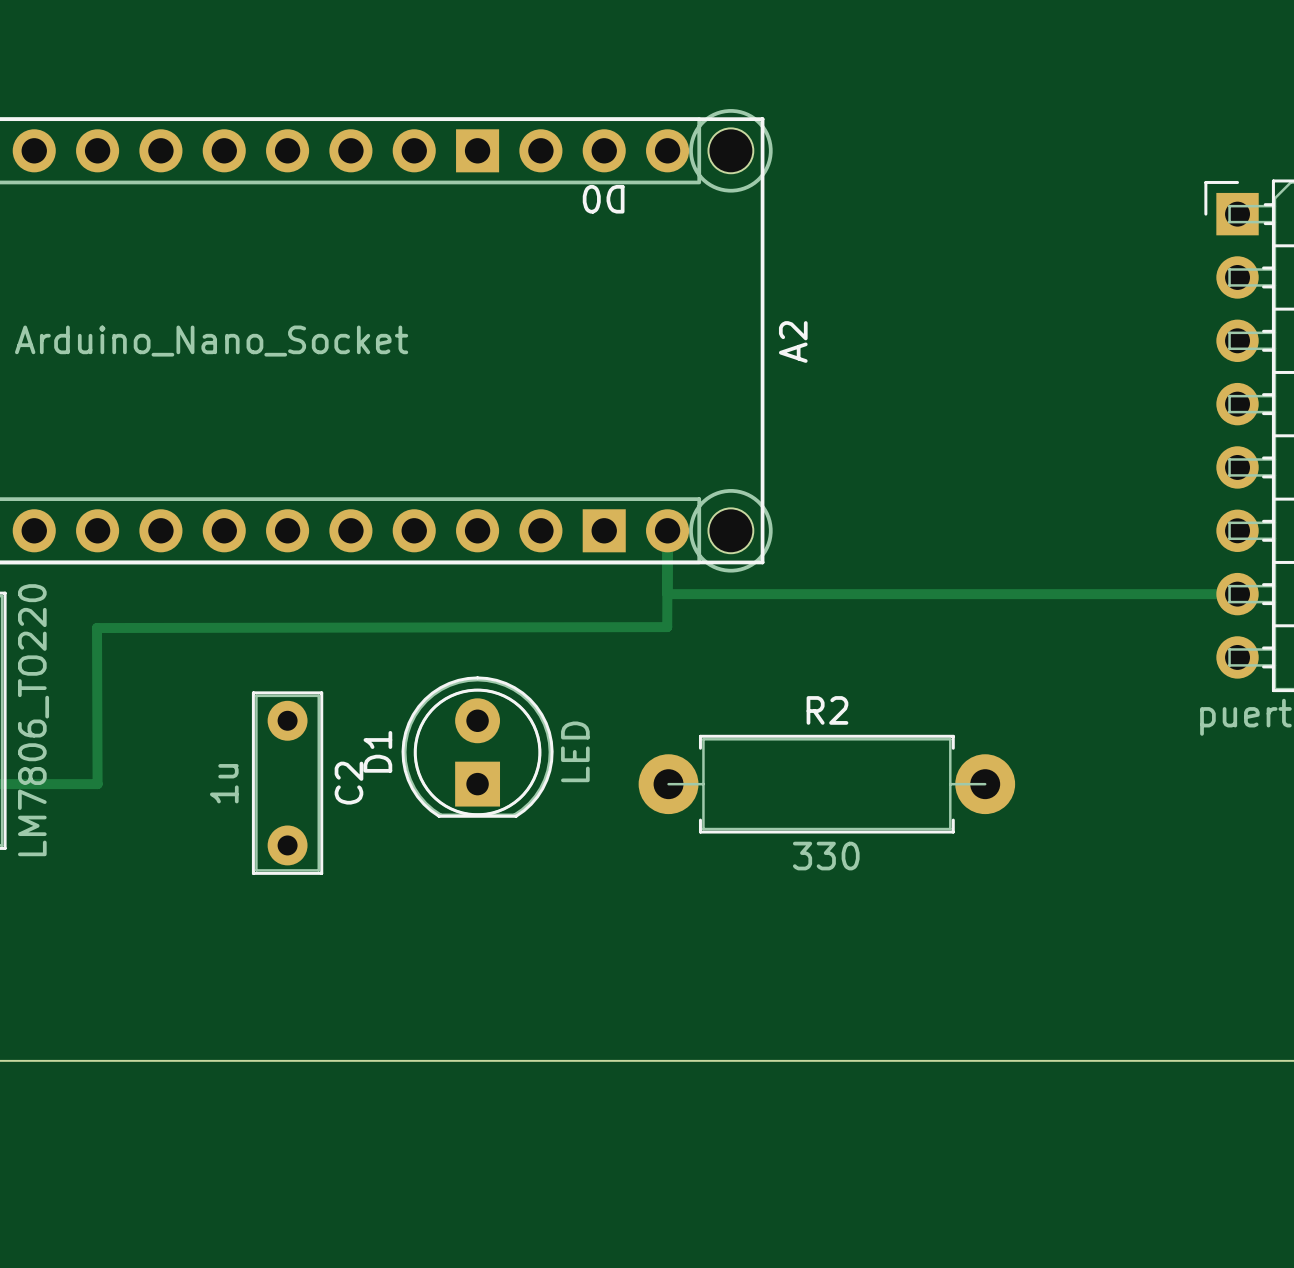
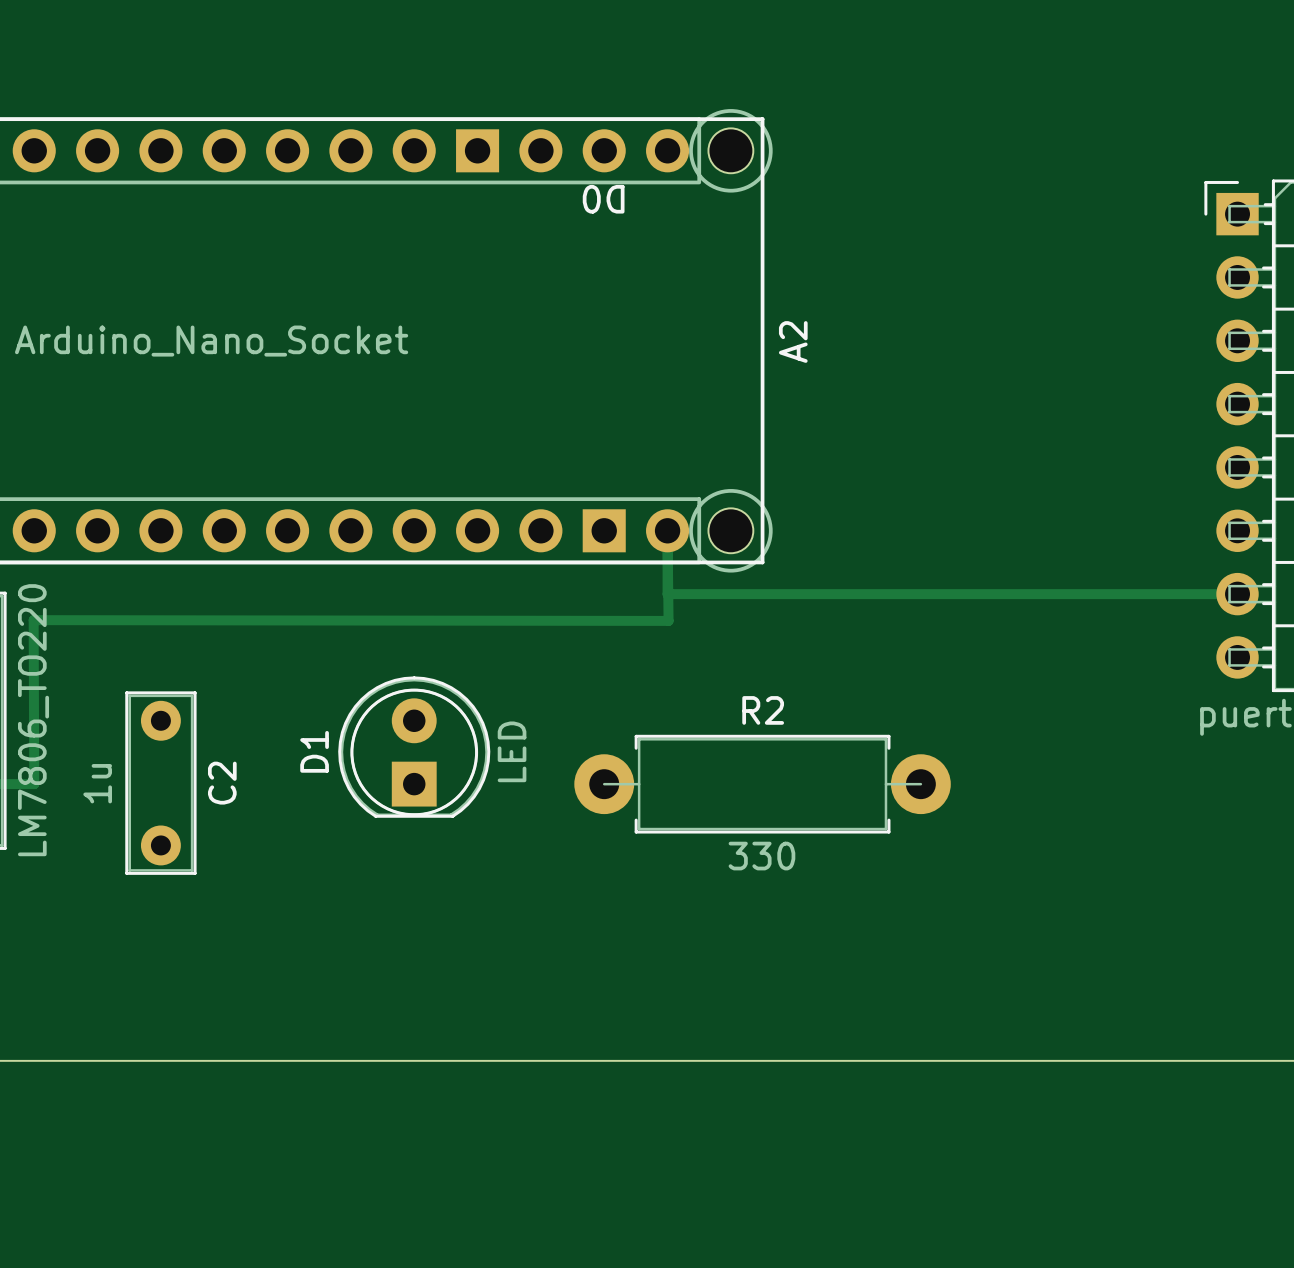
track: (667, 530) (667, 627) (97, 628) (97, 784) (34, 784) -> (667, 530) (668, 620) (33, 620) (34, 784)
D1 position: (477, 747) -> (414, 747)
C2 position: (287, 783) -> (160, 783)
R2 position: (826, 784) -> (762, 784)

